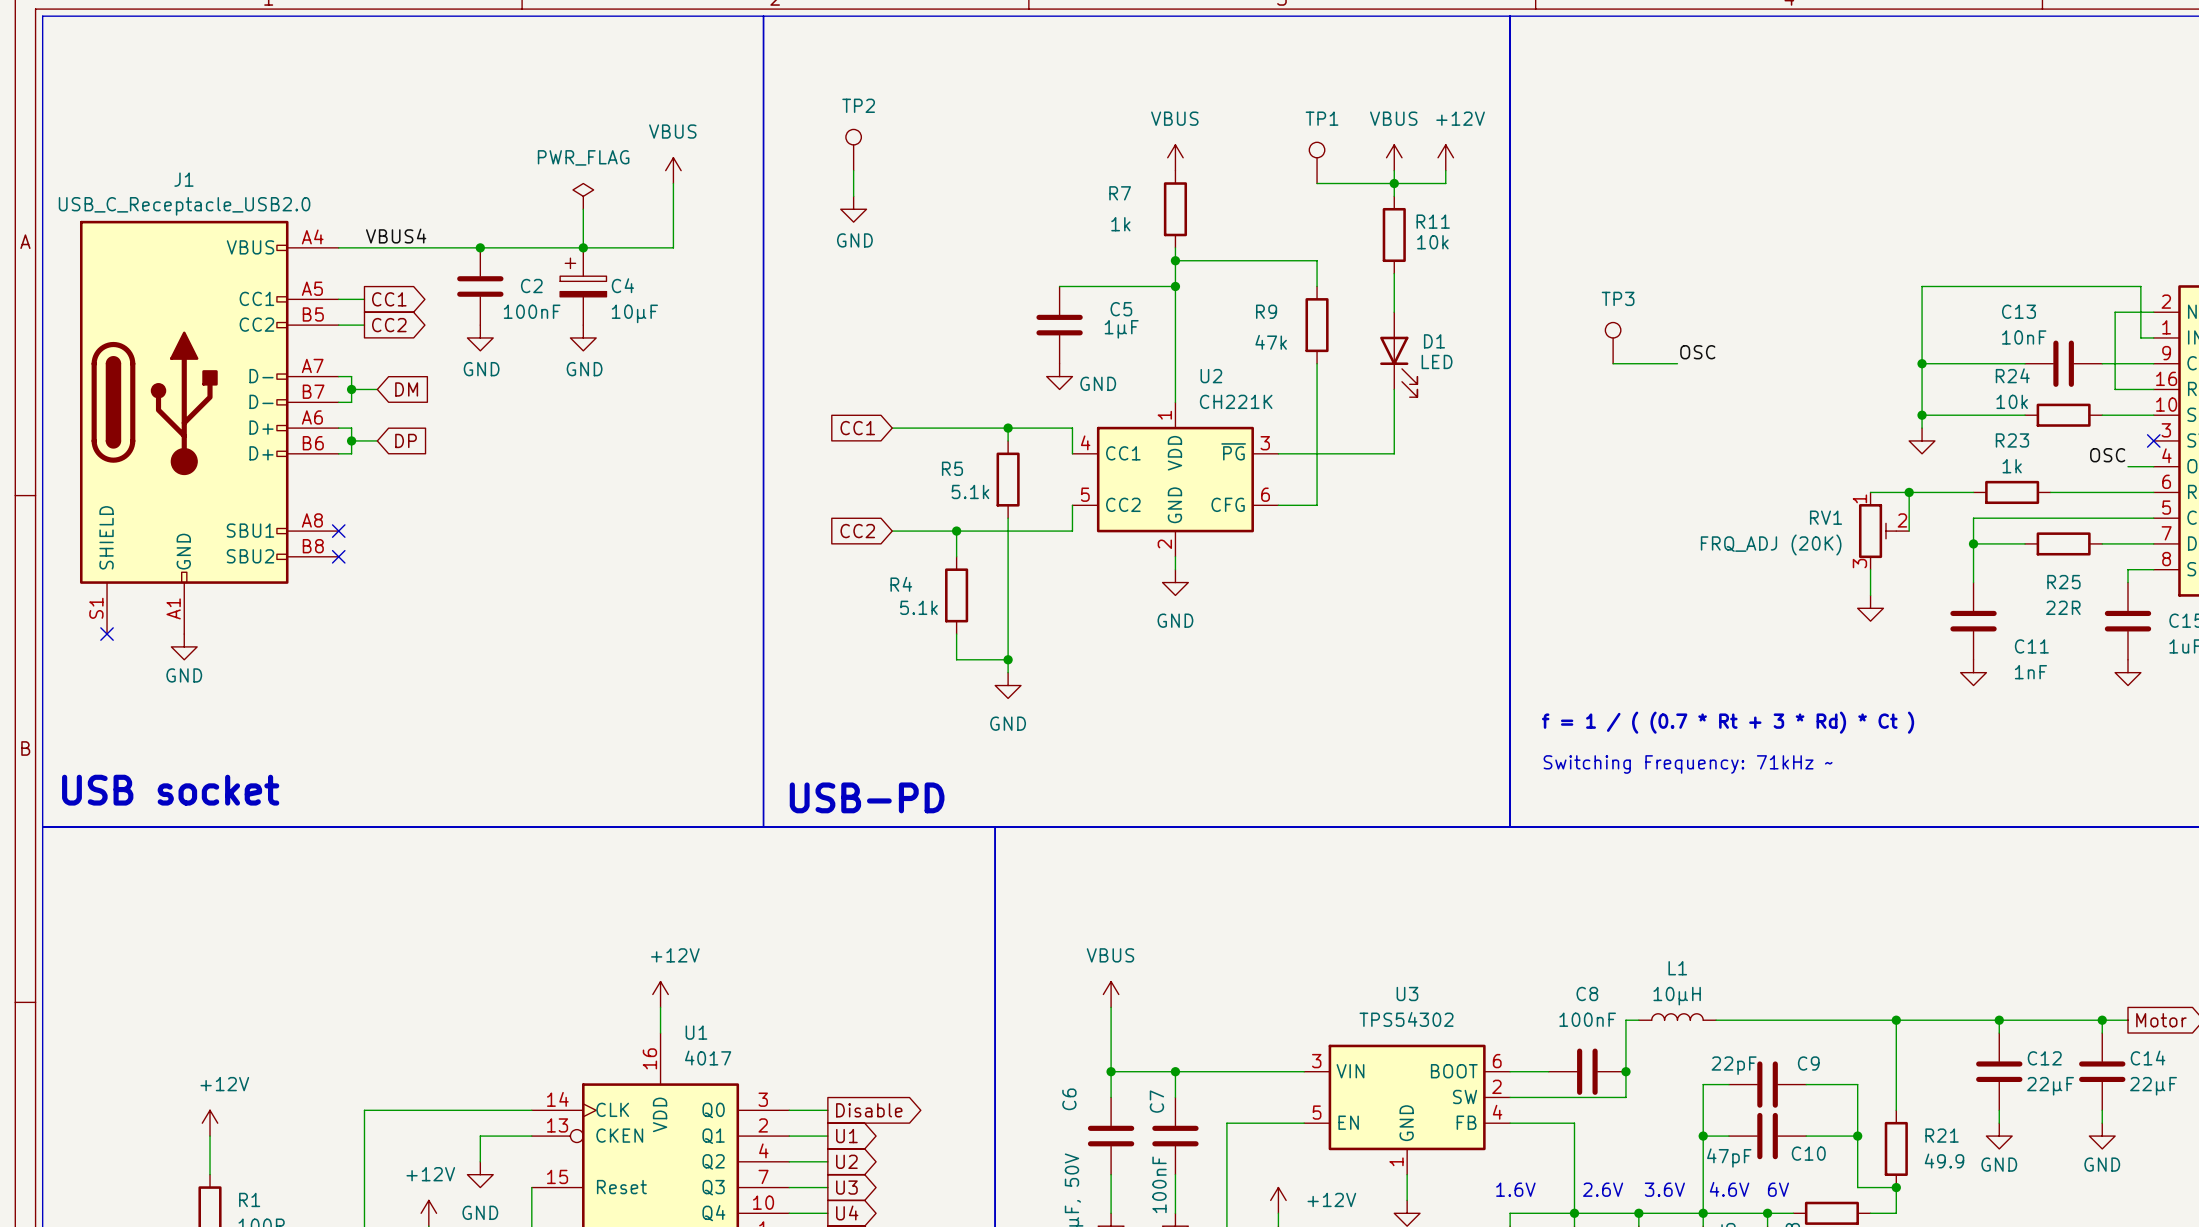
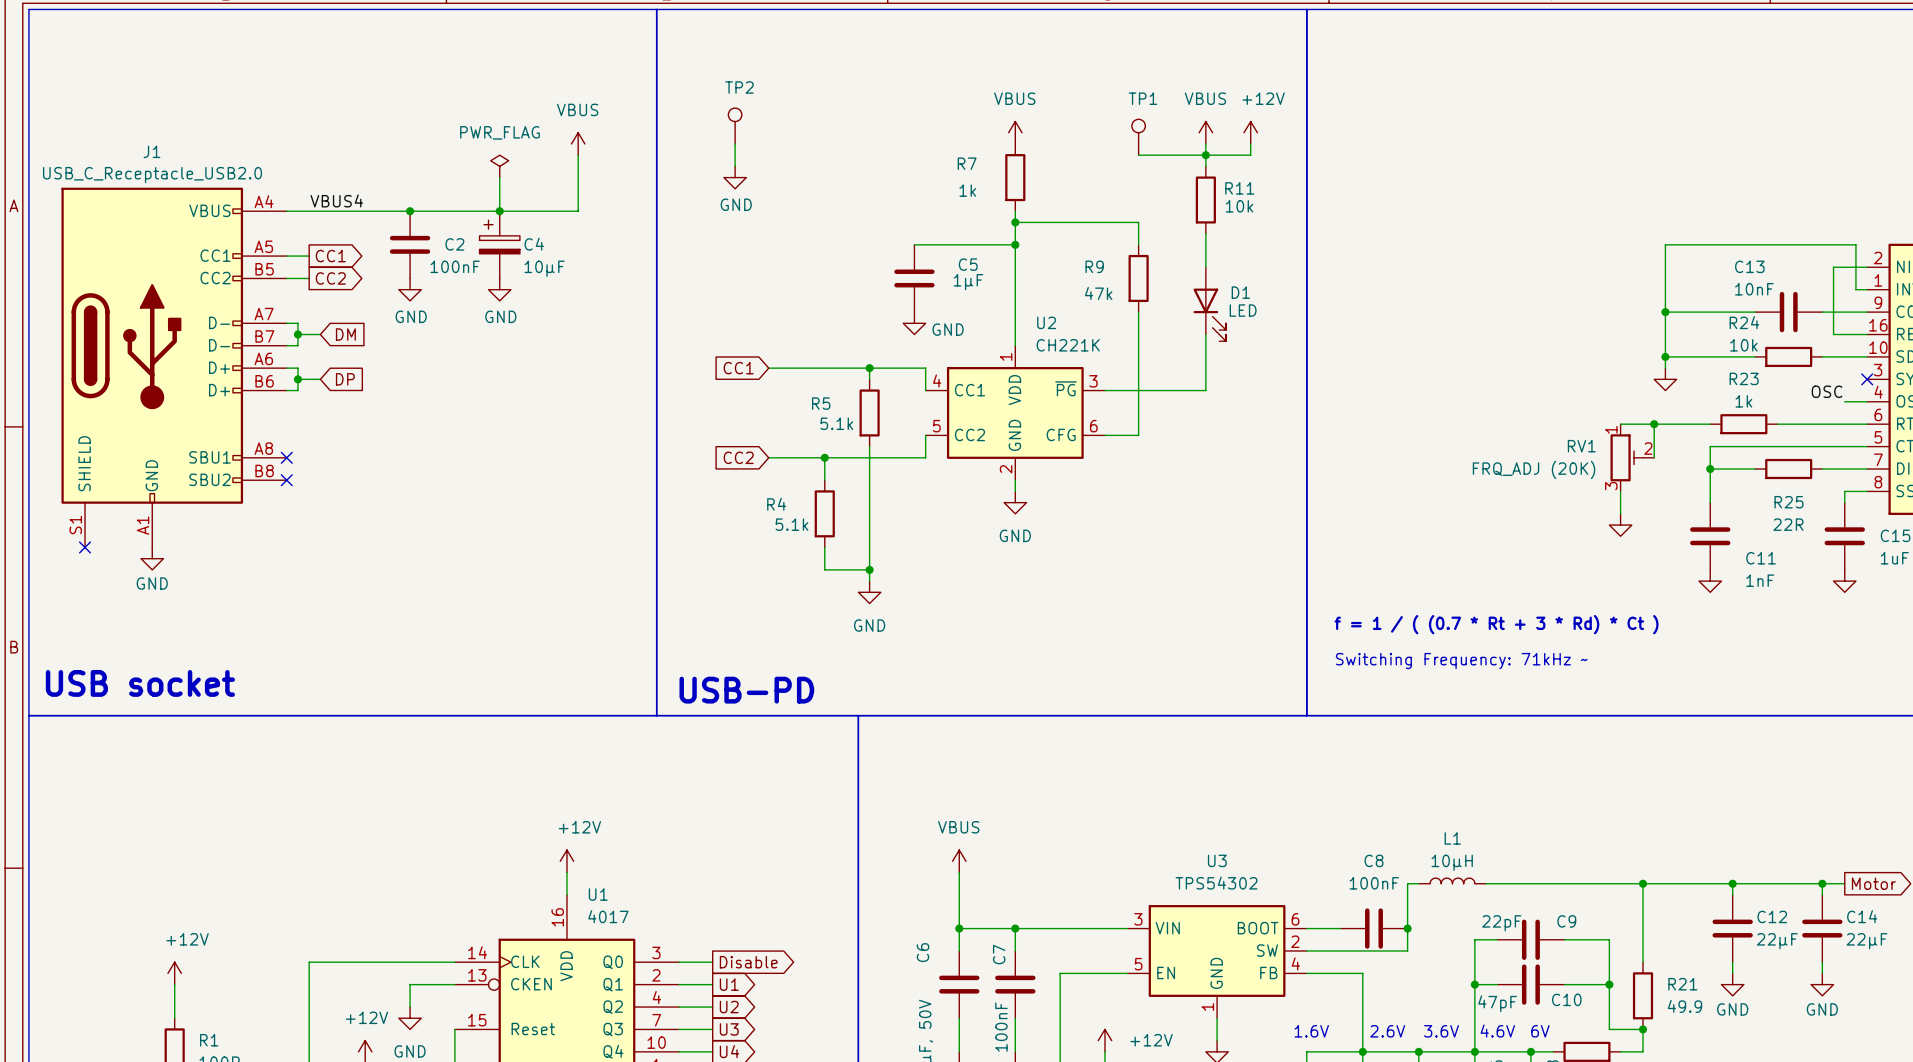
TP3: (1613, 343) -> none
label: OSC (1697, 352) -> none
wire: (1613, 363) (1677, 363) -> none

